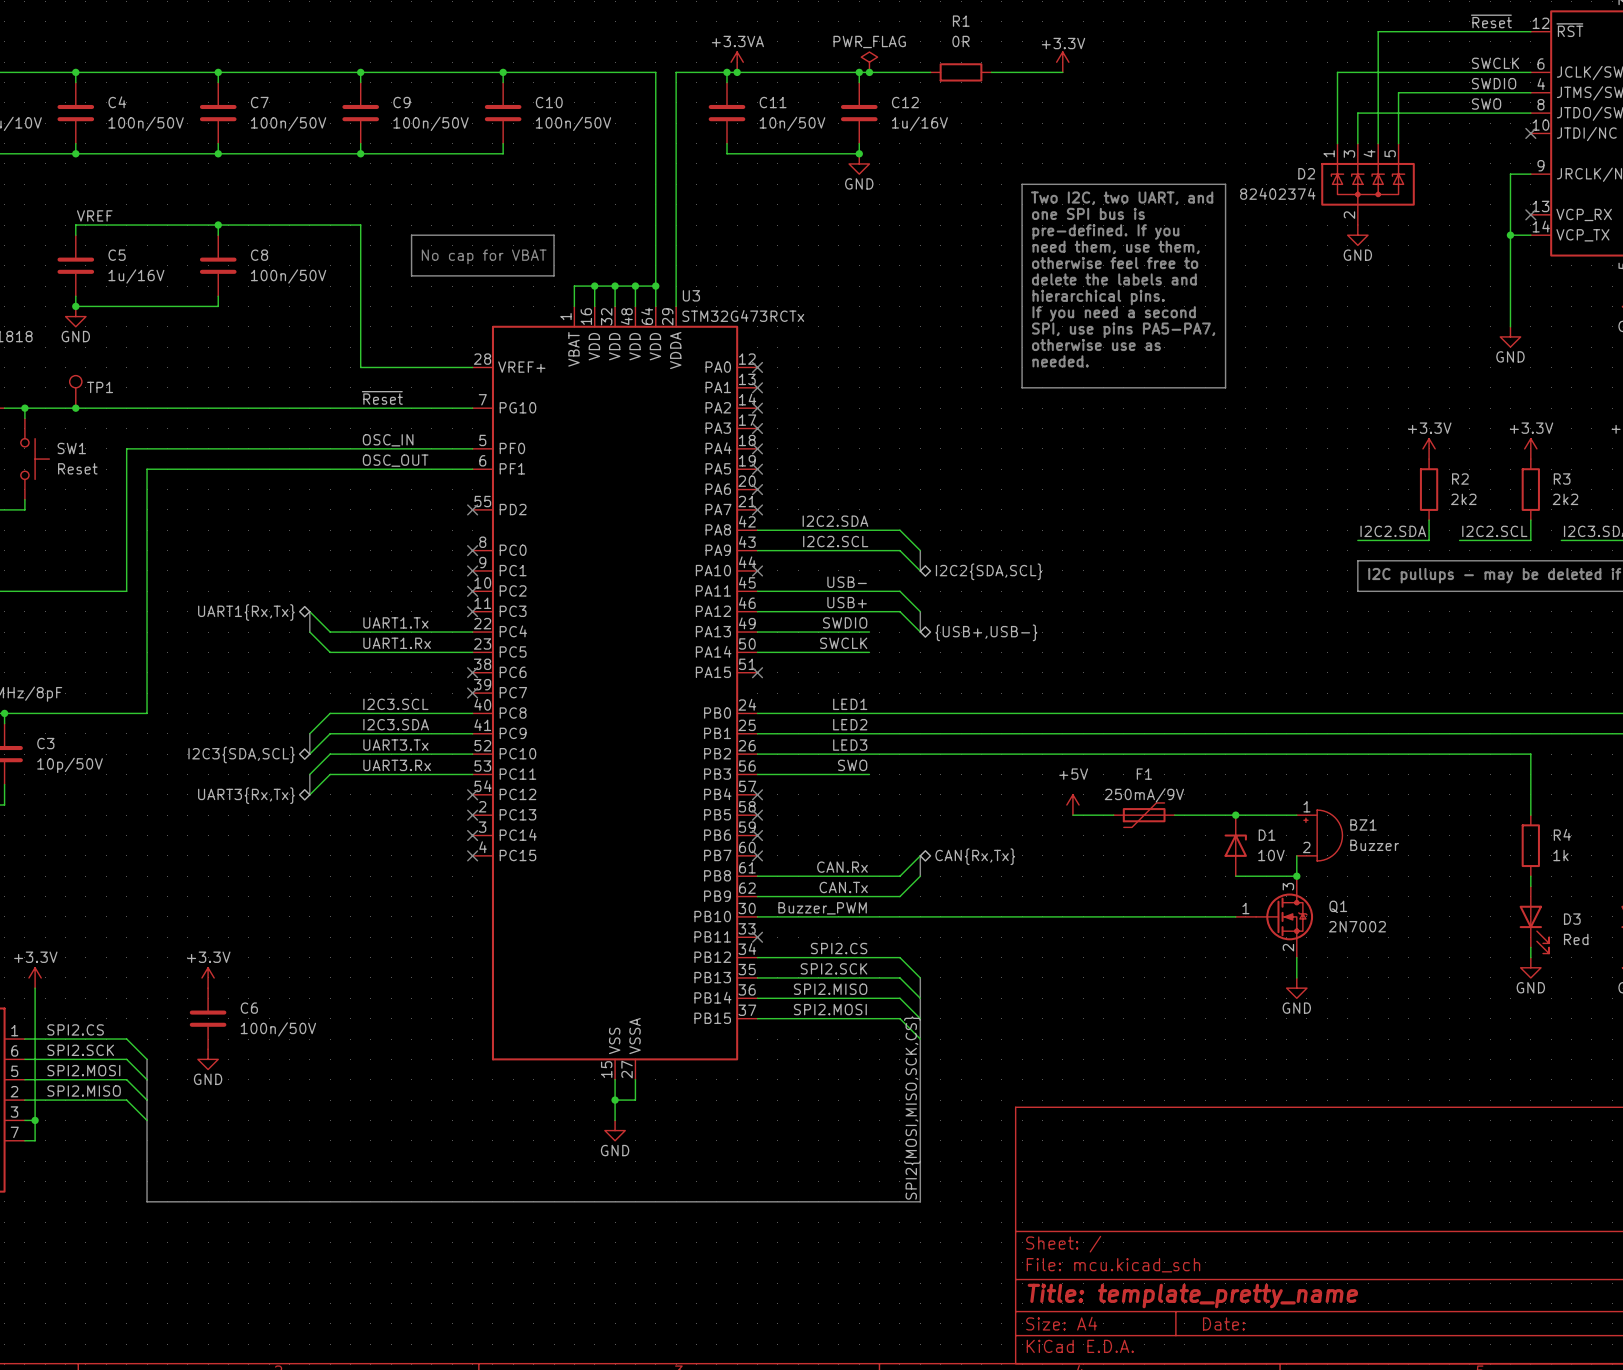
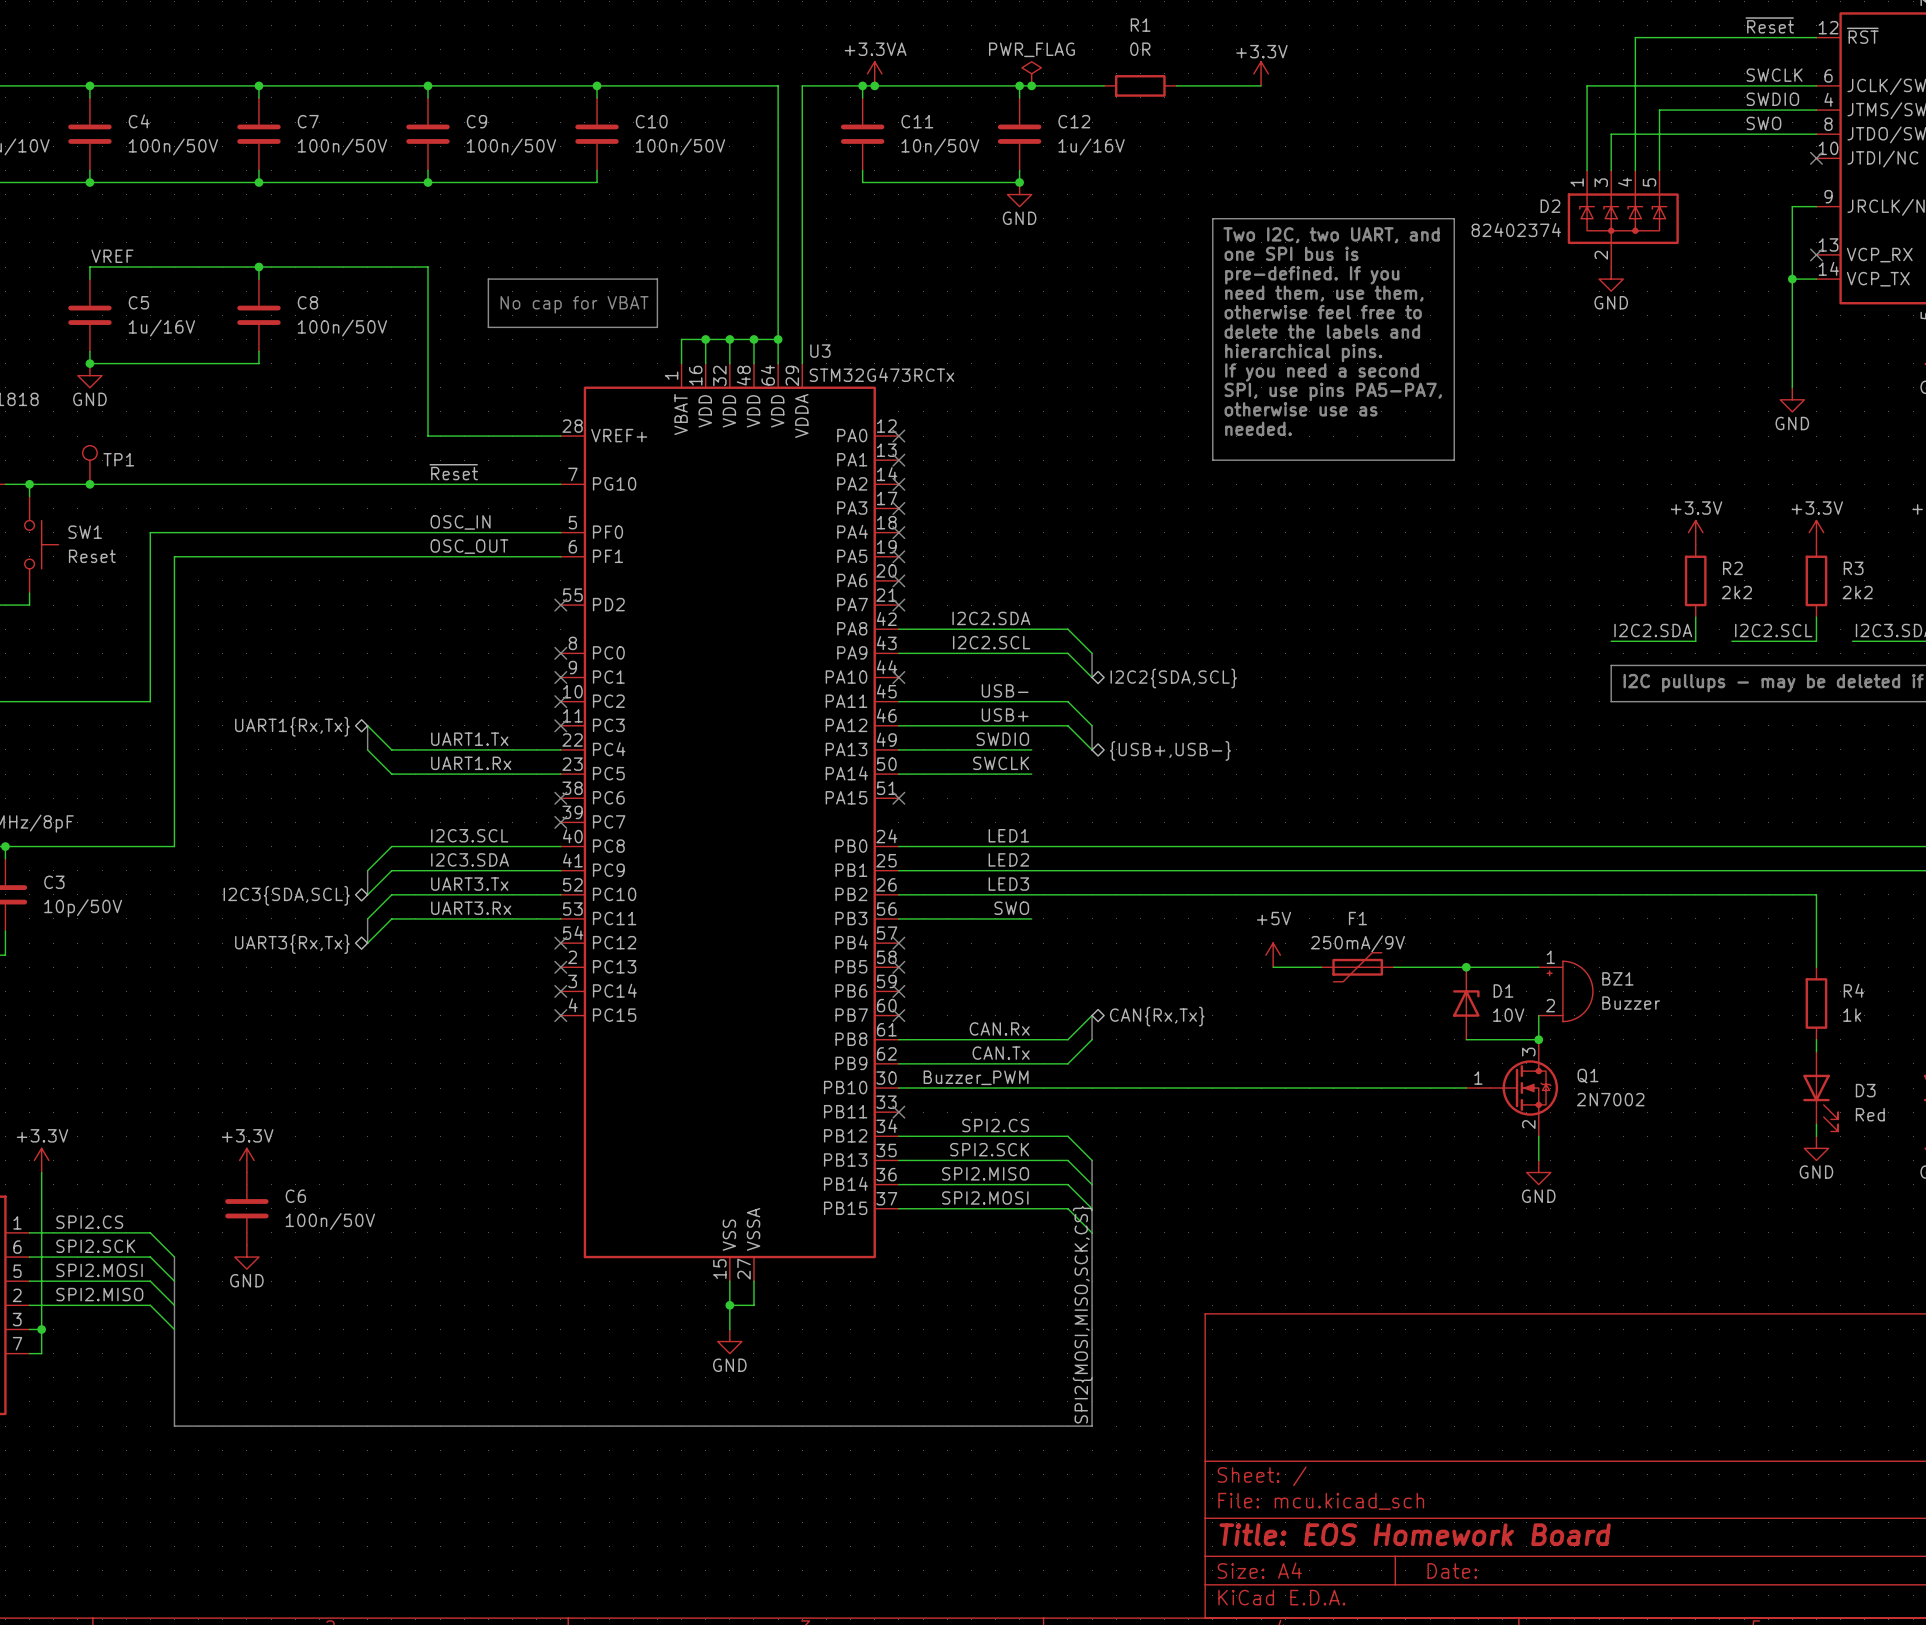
title block: Title: template_pretty_name (1192, 1296) -> Title: EOS Homework Board (1415, 1534)

